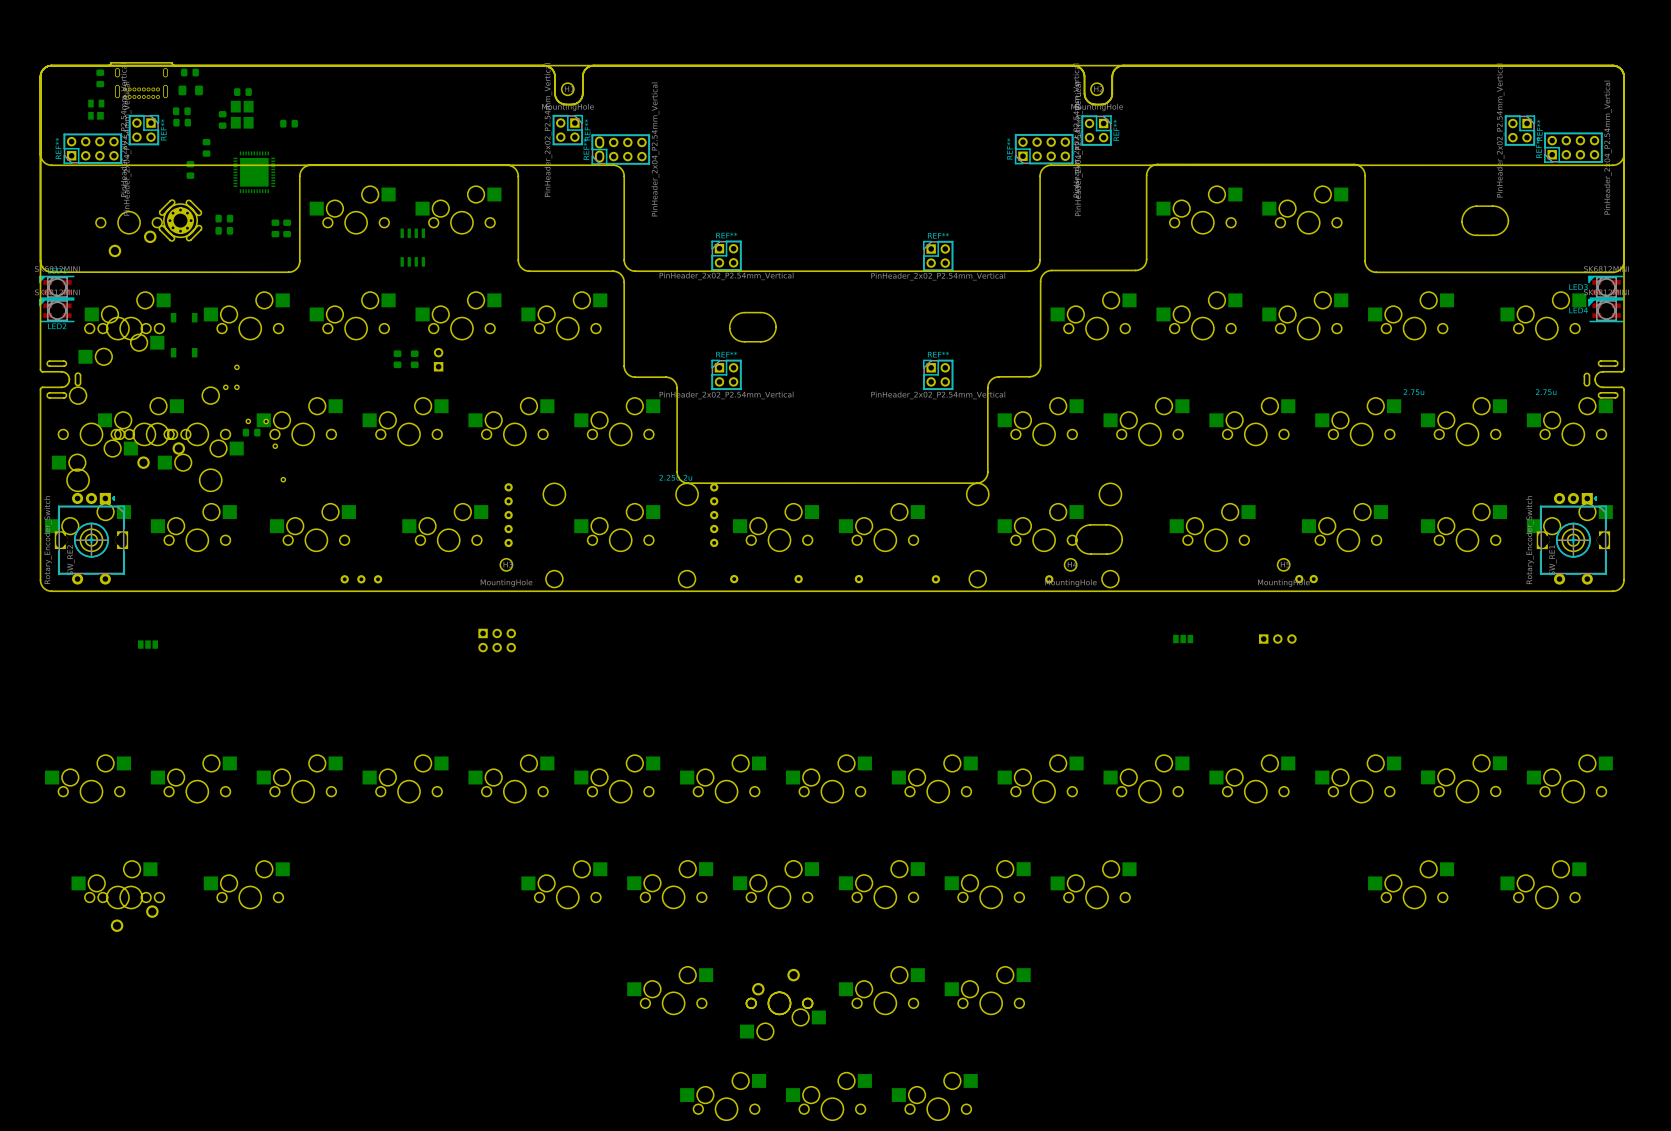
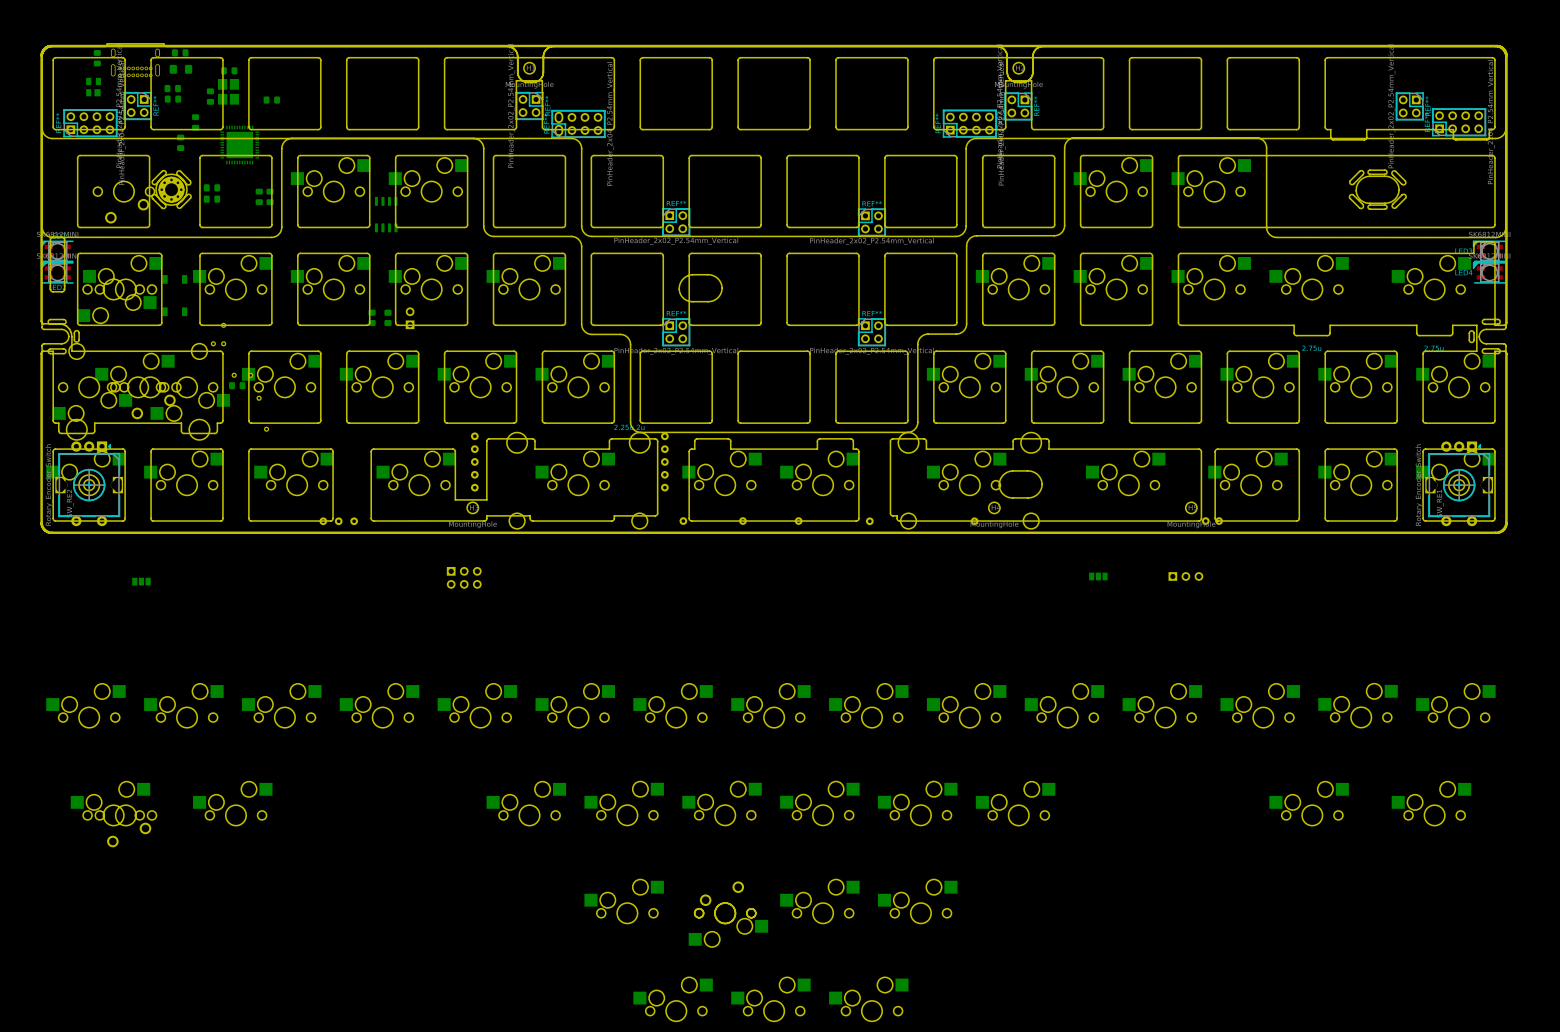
board edge: none -> (50, 45) (44, 48) (41, 55) (41, 323) (66, 326) (71, 332) (71, 351) (221, 351) (222, 420) (217, 423) (217, 431) (215, 433) (183, 433) (181, 423) (94, 423) (92, 433) (60, 433) (58, 423) (53, 420) (53, 351) (42, 351) (41, 522) (43, 528) (48, 532) (1496, 533) (1502, 531) (1506, 526) (1506, 352) (1494, 351) (1494, 422) (1425, 423) (1423, 420) (1423, 352) (1476, 351) (1476, 325) (1452, 325) (1452, 333) (1450, 335) (1418, 335) (1416, 325) (1330, 325) (1328, 335) (1296, 335) (1294, 333) (1294, 325) (1181, 325) (1178, 322) (1178, 256) (1180, 253) (1473, 253) (1475, 242) (1492, 241) (1494, 244) (1494, 325) (1505, 324) (1506, 55) (1504, 49) (1499, 46) (50, 45)
board edge: none -> (55, 57) (124, 58) (124, 128) (53, 128) (53, 60) (55, 57)
board edge: none -> (153, 57) (222, 58) (222, 128) (151, 128) (151, 60) (153, 57)
board edge: none -> (251, 57) (320, 58) (320, 128) (249, 128) (248, 60) (251, 57)
board edge: none -> (349, 57) (417, 58) (417, 128) (347, 128) (346, 60) (349, 57)
board edge: none -> (447, 57) (612, 57) (614, 60) (614, 128) (611, 129) (544, 129) (542, 80) (516, 80) (515, 129) (446, 129) (444, 127) (444, 60) (447, 57)
board edge: none -> (642, 57) (711, 58) (711, 128) (641, 128) (640, 60) (642, 57)
board edge: none -> (740, 57) (809, 58) (809, 128) (738, 128) (738, 60) (740, 57)
board edge: none -> (838, 57) (907, 58) (907, 128) (836, 128) (835, 60) (838, 57)
board edge: none -> (936, 57) (1102, 57) (1103, 60) (1103, 128) (1101, 129) (1033, 129) (1031, 80) (1005, 80) (1004, 129) (935, 129) (933, 127) (933, 60) (936, 57)
board edge: none -> (1132, 57) (1200, 58) (1200, 128) (1130, 128) (1129, 60) (1132, 57)
board edge: none -> (1229, 57) (1298, 58) (1298, 128) (1228, 128) (1227, 60) (1229, 57)
board edge: none -> (1327, 57) (1493, 57) (1494, 60) (1494, 128) (1489, 129) (1489, 137) (1487, 139) (1455, 139) (1453, 129) (1366, 129) (1364, 139) (1332, 139) (1330, 129) (1325, 127) (1325, 60) (1327, 57)
board edge: none -> (80, 155) (148, 156) (148, 226) (78, 226) (77, 158) (80, 155)
board edge: none -> (202, 155) (271, 156) (271, 226) (200, 226) (199, 158) (202, 155)
board edge: none -> (300, 155) (368, 156) (368, 226) (298, 226) (297, 158) (300, 155)
board edge: none -> (398, 155) (466, 156) (466, 226) (396, 226) (395, 158) (398, 155)
board edge: none -> (496, 155) (564, 156) (564, 226) (494, 226) (493, 158) (496, 155)
board edge: none -> (593, 155) (662, 156) (662, 226) (592, 226) (591, 158) (593, 155)
board edge: none -> (691, 155) (760, 156) (760, 226) (689, 226) (689, 158) (691, 155)
board edge: none -> (789, 155) (858, 156) (858, 226) (787, 226) (787, 158) (789, 155)
board edge: none -> (887, 155) (956, 156) (956, 226) (885, 226) (884, 158) (887, 155)
board edge: none -> (985, 155) (1053, 156) (1053, 226) (983, 226) (982, 158) (985, 155)
board edge: none -> (1083, 155) (1151, 156) (1151, 226) (1081, 226) (1080, 158) (1083, 155)
board edge: none -> (1181, 155) (1492, 155) (1494, 158) (1494, 225) (1492, 227) (1180, 227) (1178, 224) (1178, 158) (1181, 155)
board edge: none -> (1370, 170) (1385, 170) (1387, 172) (1385, 174) (1369, 174) (1368, 171) (1370, 170)
board edge: none -> (1359, 171) (1350, 180) (1350, 184) (1353, 184) (1363, 174) (1362, 171) (1359, 171)
board edge: none -> (1395, 171) (1405, 181) (1404, 184) (1401, 184) (1392, 174) (1392, 171) (1395, 171)
board edge: none -> (171, 177) (162, 181) (159, 189) (162, 198) (171, 202) (180, 198) (183, 189) (180, 181) (171, 177)
board edge: none -> (1353, 195) (1363, 204) (1362, 208) (1359, 207) (1349, 198) (1350, 195) (1353, 195)
board edge: none -> (1401, 195) (1392, 204) (1393, 207) (1396, 207) (1405, 197) (1405, 194) (1401, 195)
board edge: none -> (1370, 205) (1385, 205) (1387, 207) (1385, 209) (1369, 209) (1368, 206) (1370, 205)
board edge: none -> (53, 237) (50, 240) (50, 289) (52, 291) (62, 291) (64, 289) (64, 239) (62, 237) (53, 237)
board edge: none -> (80, 253) (160, 253) (161, 324) (78, 324) (77, 255) (80, 253)
board edge: none -> (202, 253) (271, 254) (271, 324) (200, 324) (199, 255) (202, 253)
board edge: none -> (300, 253) (368, 254) (368, 324) (298, 324) (297, 255) (300, 253)
board edge: none -> (398, 253) (466, 254) (466, 324) (396, 324) (395, 255) (398, 253)
board edge: none -> (496, 253) (564, 254) (564, 324) (494, 324) (493, 255) (496, 253)
board edge: none -> (593, 253) (662, 254) (662, 324) (592, 324) (591, 255) (593, 253)
board edge: none -> (691, 253) (760, 254) (760, 324) (689, 324) (689, 255) (691, 253)
board edge: none -> (789, 253) (858, 254) (858, 324) (787, 324) (787, 255) (789, 253)
board edge: none -> (887, 253) (956, 254) (956, 324) (885, 324) (884, 255) (887, 253)
board edge: none -> (985, 253) (1053, 254) (1053, 324) (983, 324) (982, 255) (985, 253)
board edge: none -> (1083, 253) (1151, 254) (1151, 324) (1081, 324) (1080, 255) (1083, 253)
board edge: none -> (251, 351) (320, 351) (320, 422) (249, 422) (248, 353) (251, 351)
board edge: none -> (349, 351) (417, 351) (417, 422) (347, 422) (346, 353) (349, 351)
board edge: none -> (447, 351) (515, 351) (515, 422) (445, 422) (444, 353) (447, 351)
board edge: none -> (545, 351) (613, 351) (613, 422) (543, 422) (542, 353) (545, 351)
board edge: none -> (642, 351) (711, 351) (711, 422) (641, 422) (640, 353) (642, 351)
board edge: none -> (740, 351) (809, 351) (809, 422) (738, 422) (738, 353) (740, 351)
board edge: none -> (838, 351) (907, 351) (907, 422) (836, 422) (835, 353) (838, 351)
board edge: none -> (936, 351) (1004, 351) (1004, 422) (934, 422) (933, 353) (936, 351)
board edge: none -> (1034, 351) (1102, 351) (1102, 422) (1032, 422) (1031, 353) (1034, 351)
board edge: none -> (1132, 351) (1200, 351) (1200, 422) (1130, 422) (1129, 353) (1132, 351)
board edge: none -> (1229, 351) (1298, 352) (1298, 422) (1228, 422) (1227, 353) (1229, 351)
board edge: none -> (1327, 351) (1396, 352) (1396, 422) (1325, 422) (1325, 353) (1327, 351)
board edge: none -> (489, 438) (532, 438) (534, 440) (535, 449) (609, 449) (609, 440) (611, 438) (656, 439) (657, 441) (657, 514) (614, 515) (611, 521) (532, 521) (530, 515) (486, 515) (484, 520) (371, 519) (372, 449) (453, 449) (455, 499) (486, 499) (486, 441) (489, 438)
board edge: none -> (697, 438) (728, 438) (730, 449) (817, 449) (819, 438) (852, 439) (853, 449) (858, 451) (858, 519) (690, 520) (689, 451) (694, 449) (694, 440) (697, 438)
board edge: none -> (893, 438) (924, 438) (926, 449) (1013, 449) (1014, 438) (1046, 438) (1048, 440) (1049, 449) (1199, 449) (1201, 451) (1201, 519) (1198, 521) (898, 520) (897, 515) (890, 513) (890, 441) (893, 438)
board edge: none -> (55, 449) (124, 449) (124, 520) (54, 520) (53, 451) (55, 449)
board edge: none -> (152, 449) (222, 449) (222, 520) (151, 520) (151, 451) (152, 449)
board edge: none -> (251, 449) (332, 449) (332, 520) (249, 520) (248, 451) (251, 449)
board edge: none -> (1296, 449) (1216, 449) (1215, 520) (1298, 520) (1299, 451) (1296, 449)
board edge: none -> (1327, 449) (1396, 449) (1396, 520) (1325, 520) (1325, 451) (1327, 449)
board edge: none -> (1425, 449) (1494, 449) (1494, 520) (1423, 520) (1423, 451) (1425, 449)

